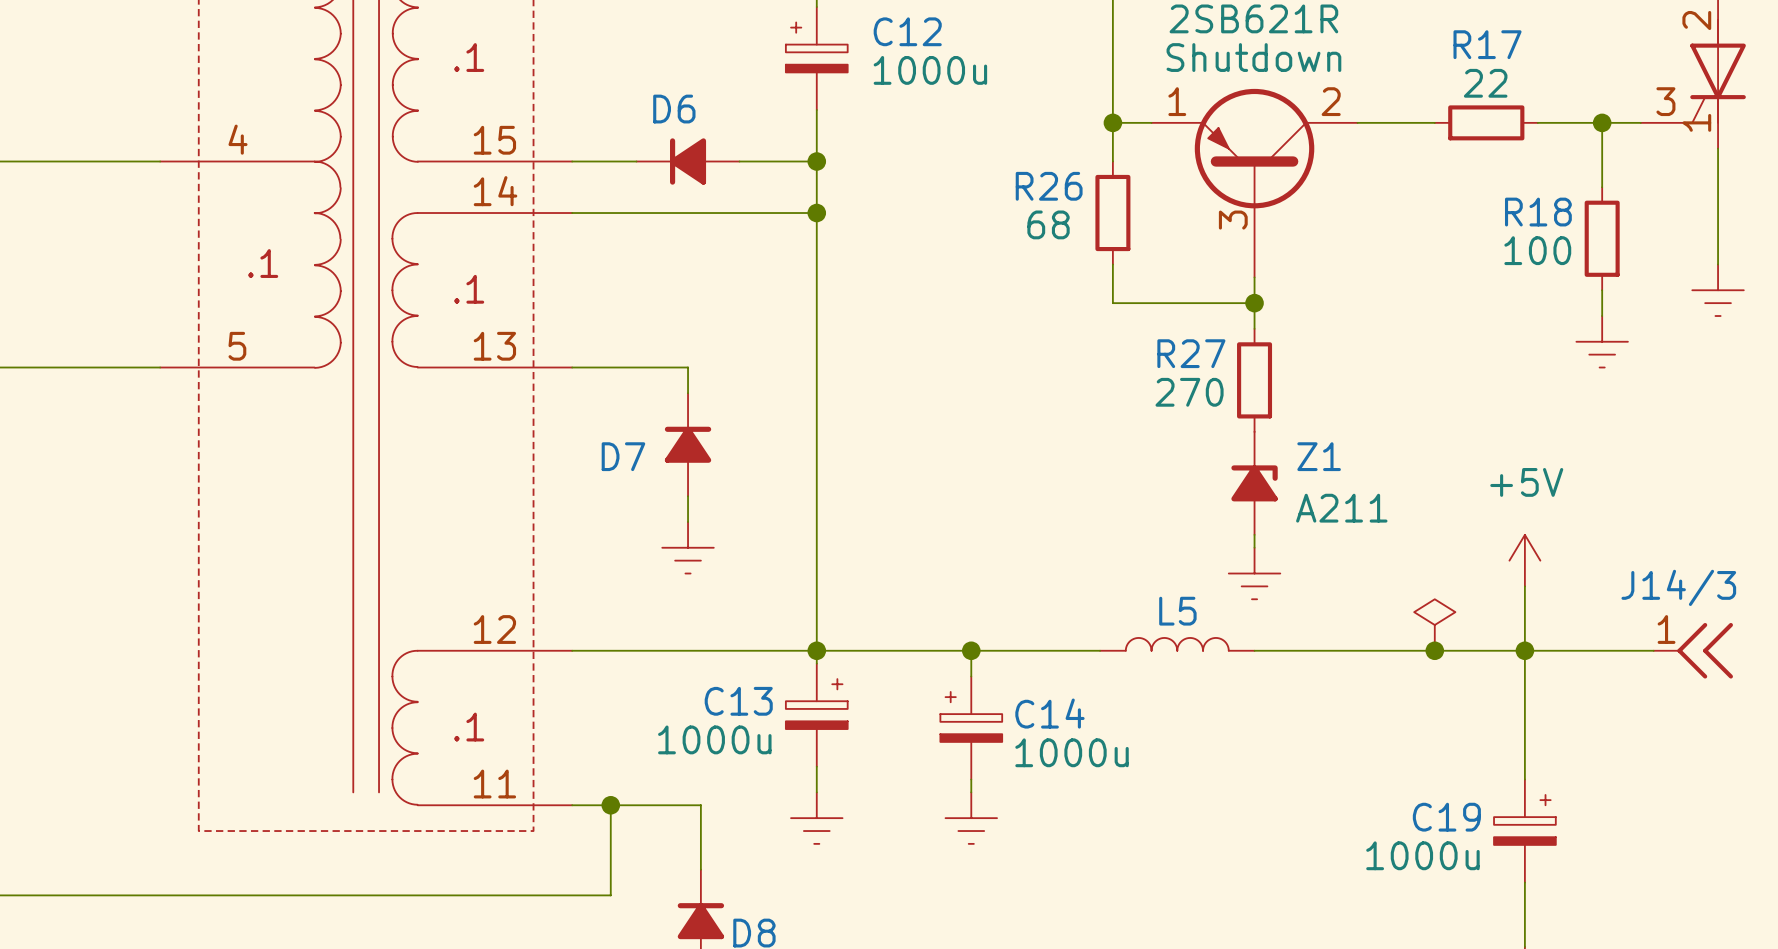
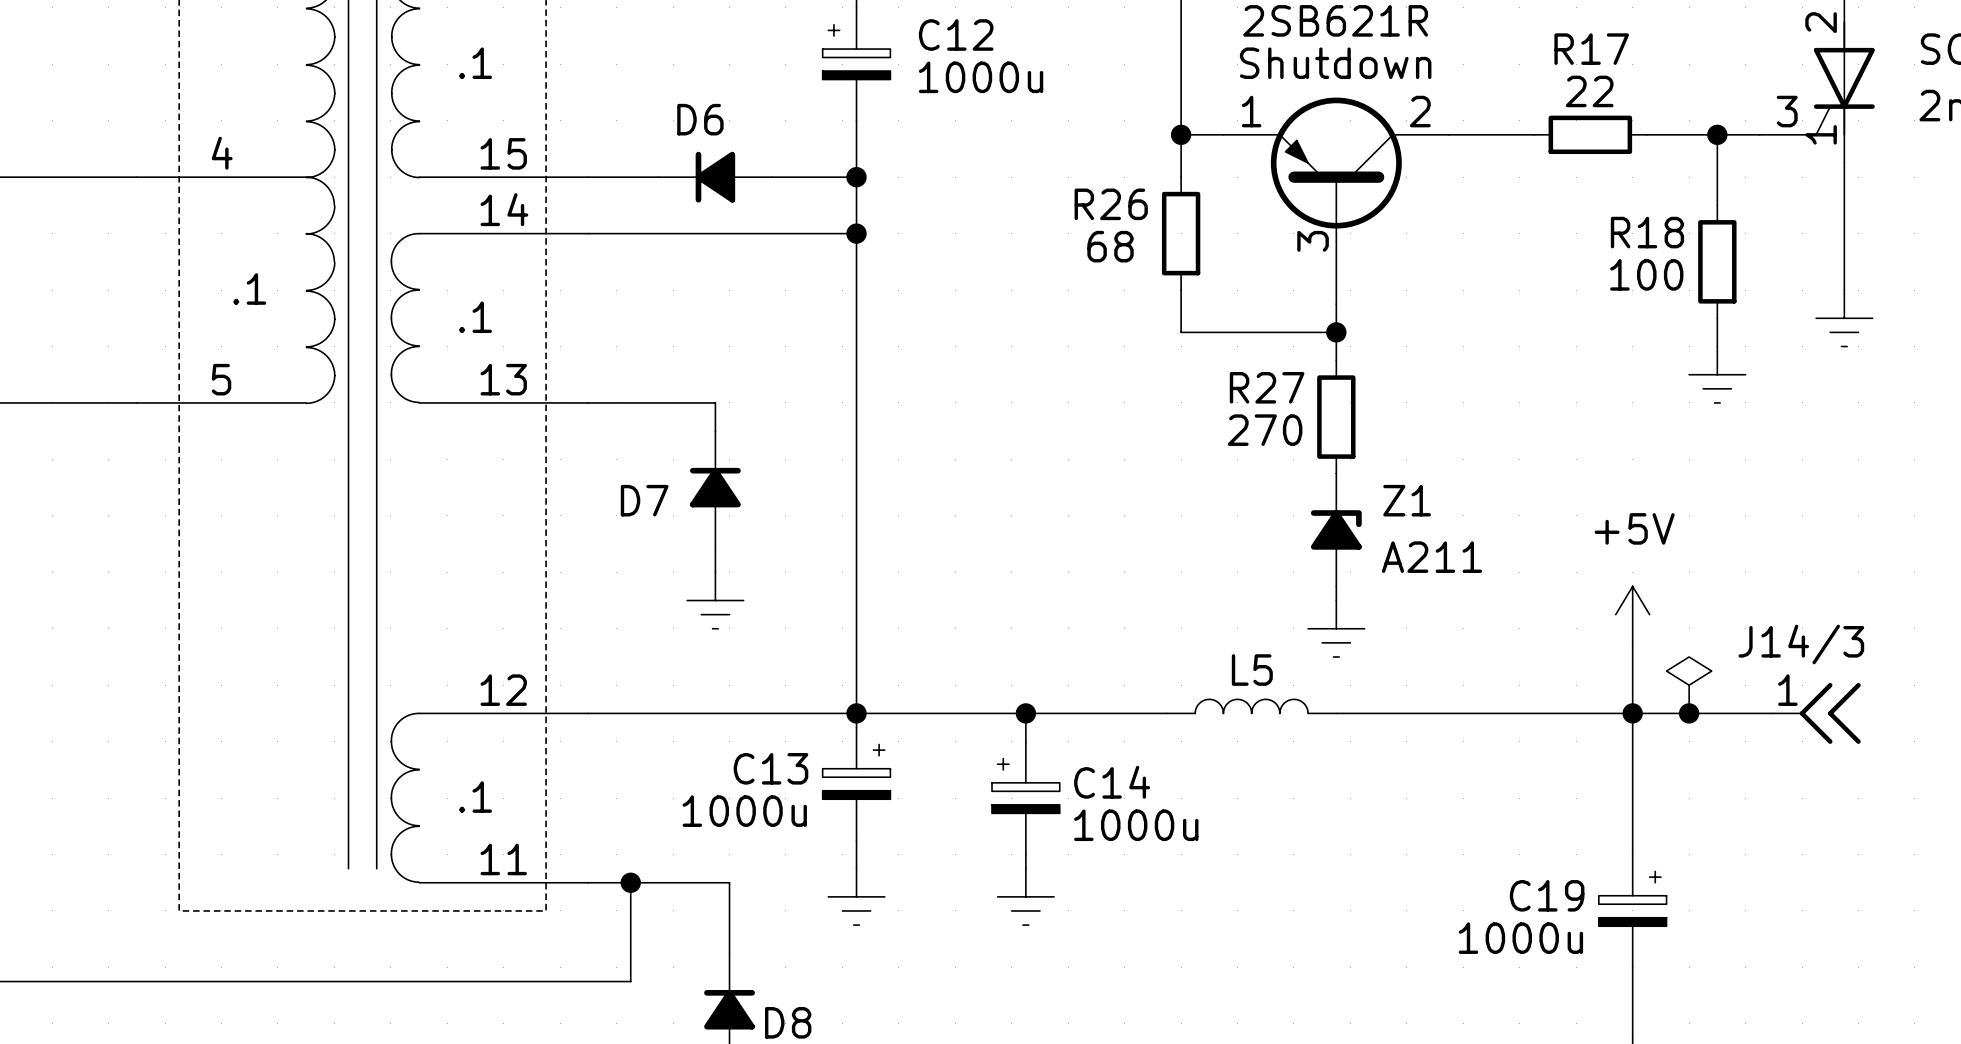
power symbol position: (1434, 625) -> (1689, 685)
junction: (1434, 650) -> none
junction: none -> (1689, 713)

